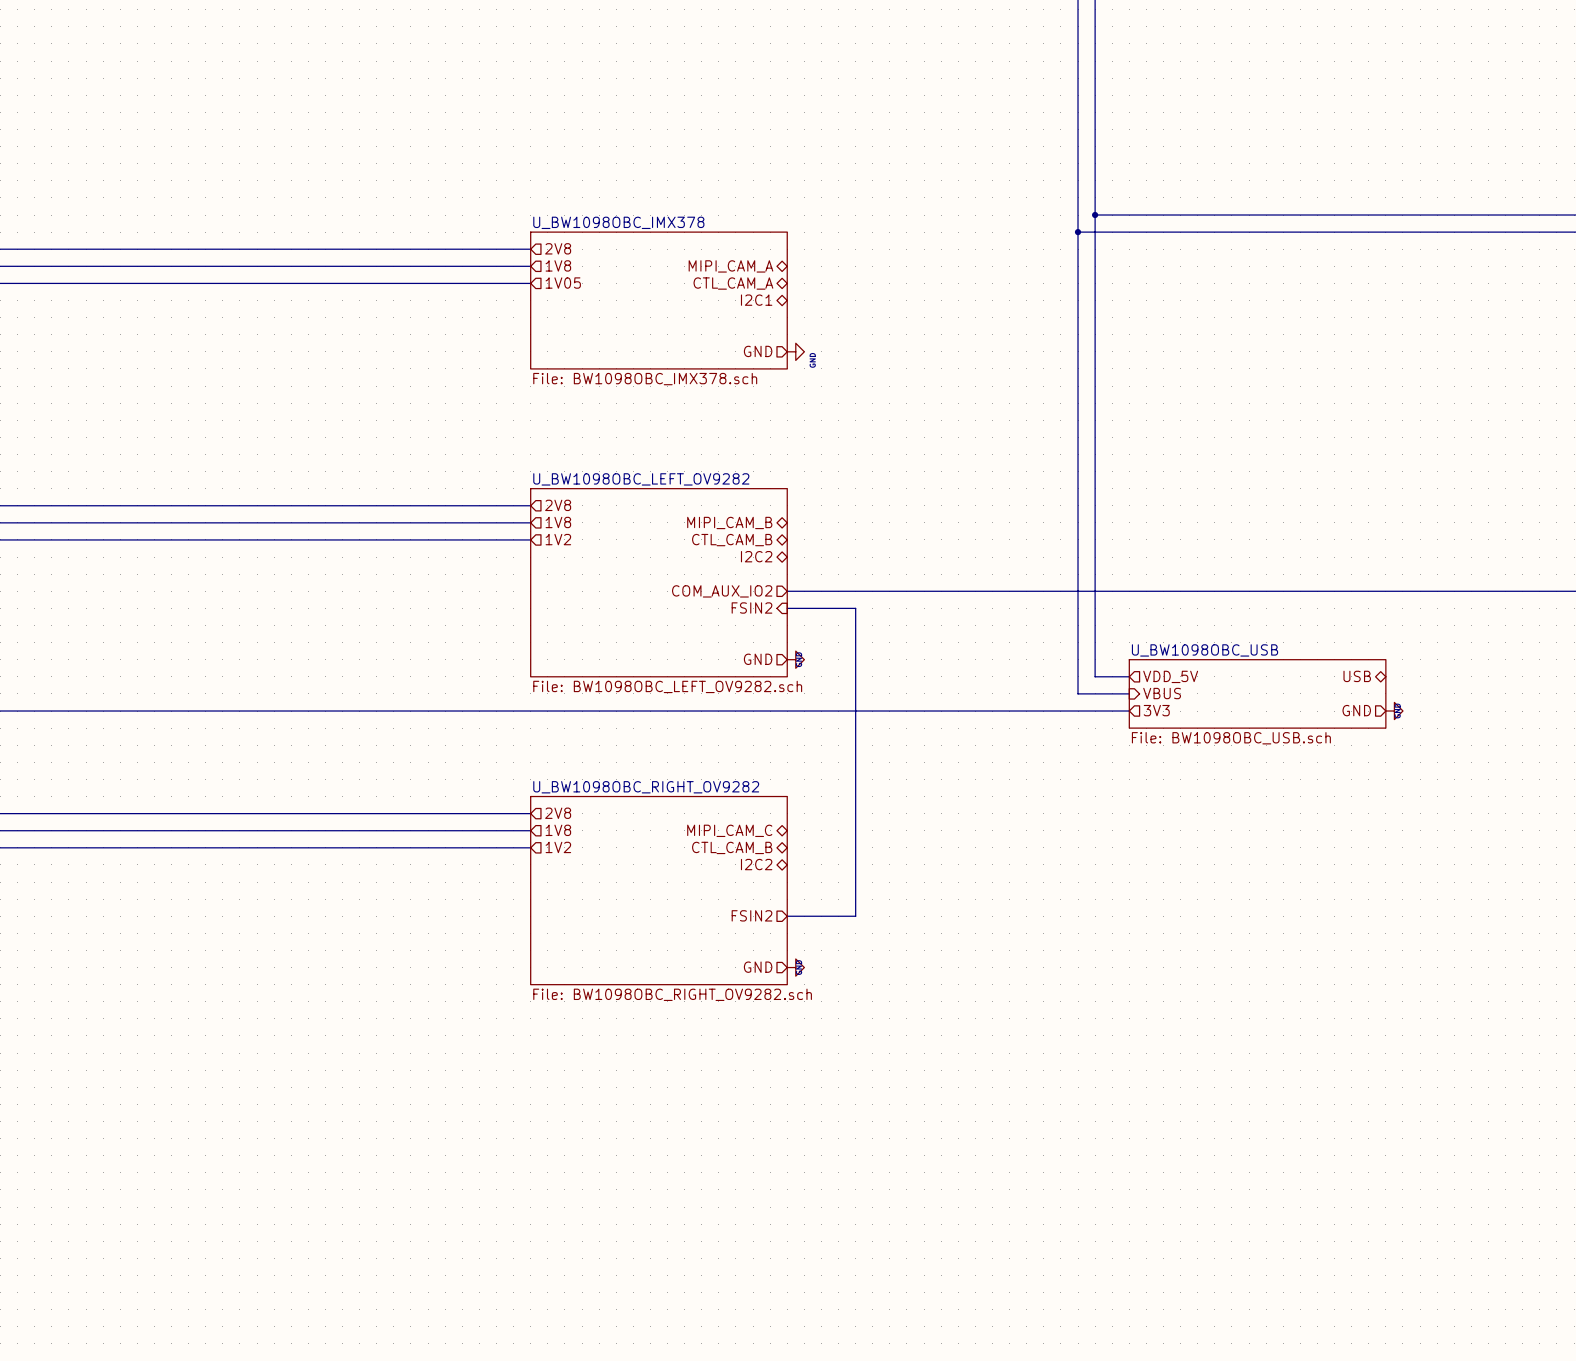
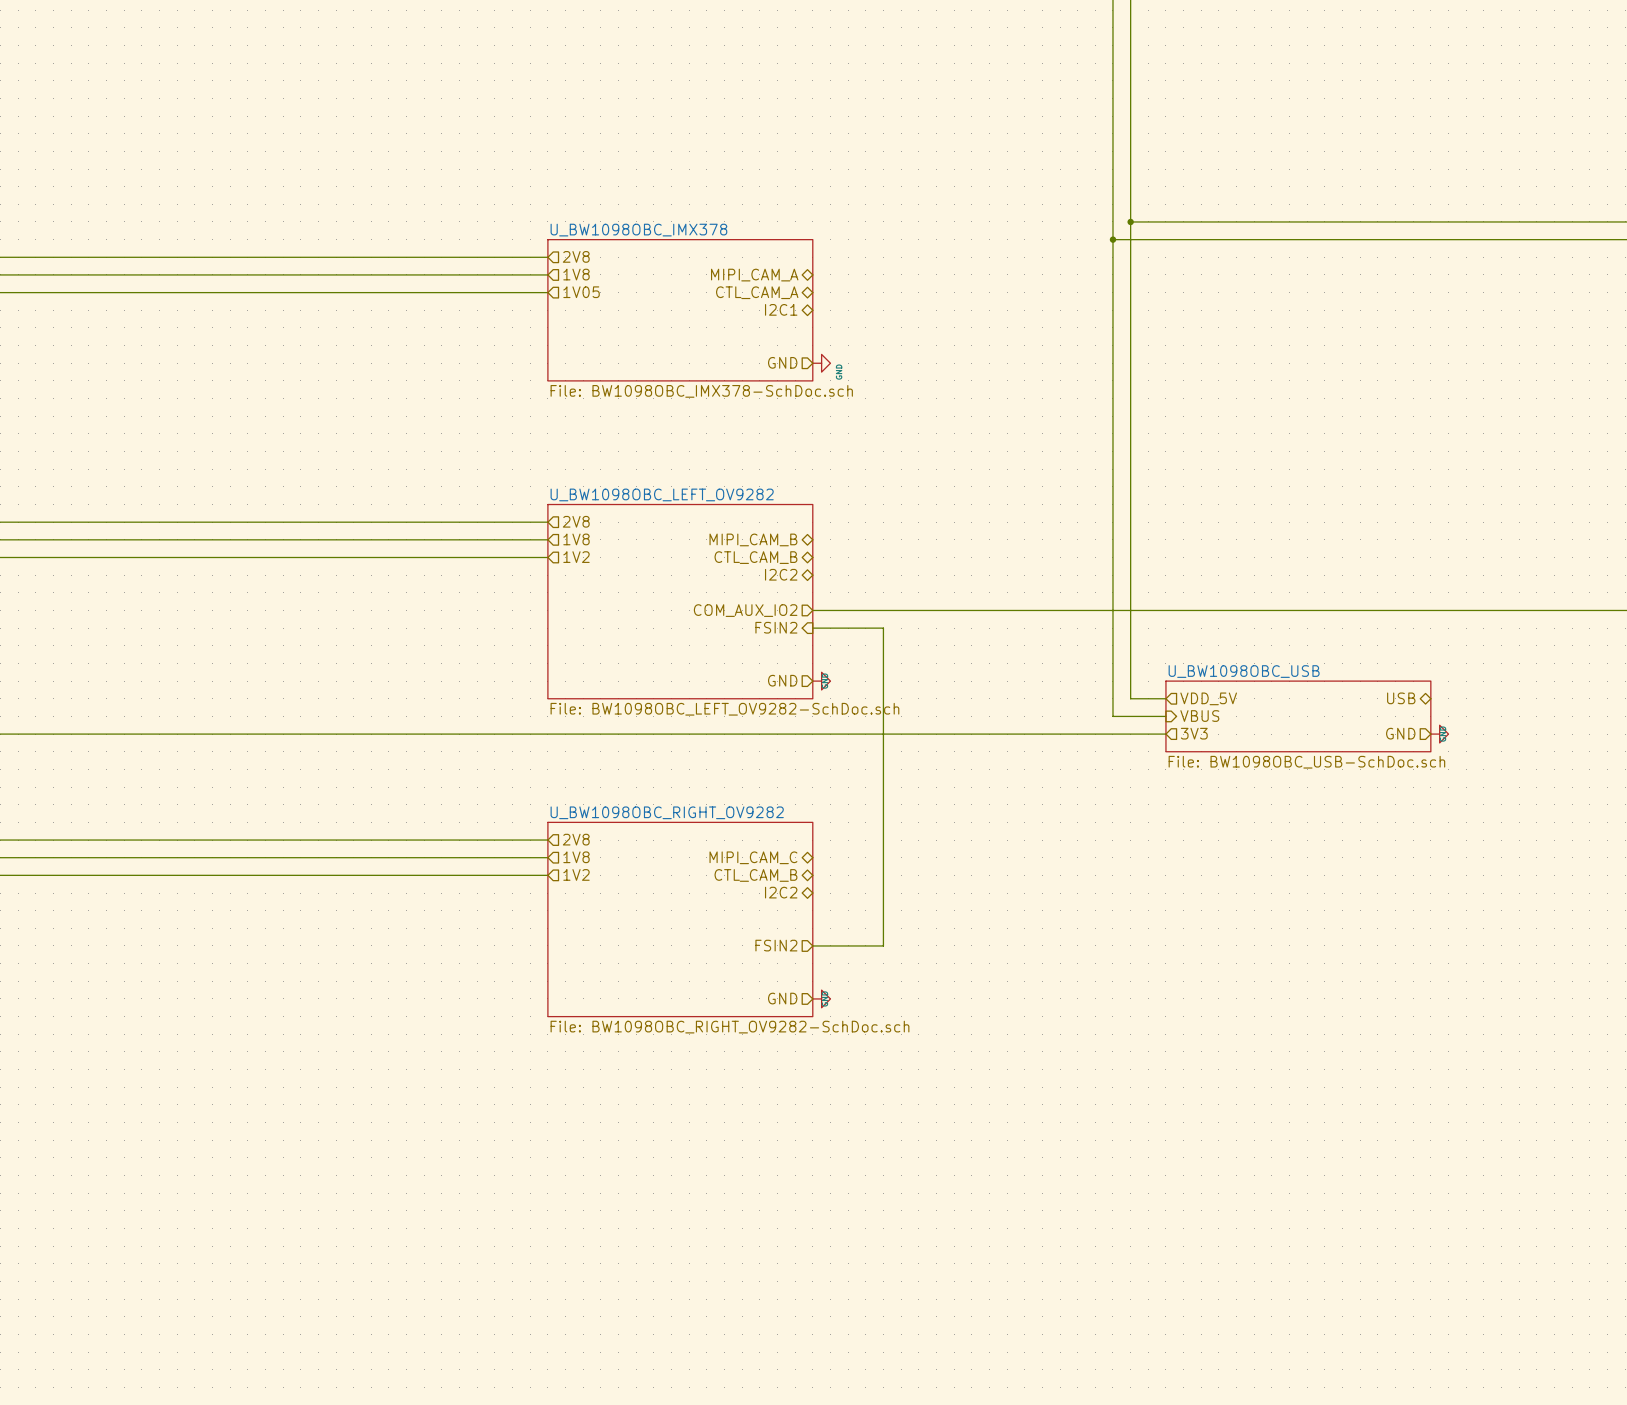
sheet U_BW1098OBC_IMX378 value: File: BW1098OBC_IMX378.sch (645, 379) -> File: BW1098OBC_IMX378-SchDoc.sch (701, 391)
sheet U_BW1098OBC_LEFT_OV9282 value: File: BW1098OBC_LEFT_OV9282.sch (667, 686) -> File: BW1098OBC_LEFT_OV9282-SchDoc.sch (724, 709)
sheet U_BW1098OBC_USB value: File: BW1098OBC_USB.sch (1231, 738) -> File: BW1098OBC_USB-SchDoc.sch (1306, 762)
sheet U_BW1098OBC_RIGHT_OV9282 value: File: BW1098OBC_RIGHT_OV9282.sch (672, 994) -> File: BW1098OBC_RIGHT_OV9282-SchDoc.sch (729, 1027)

